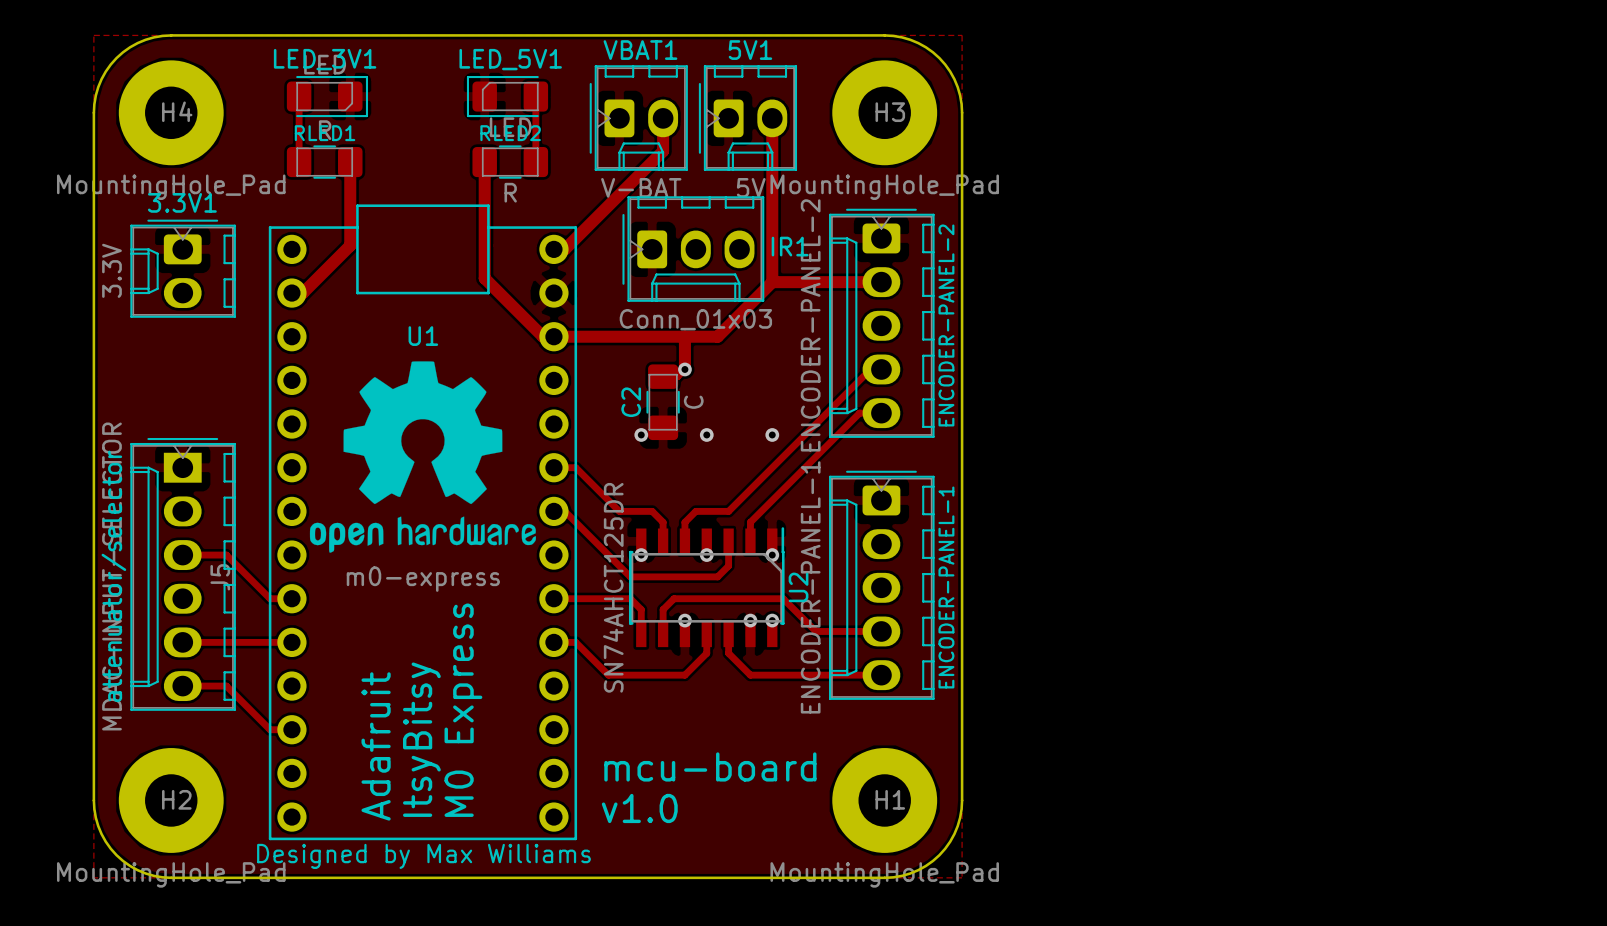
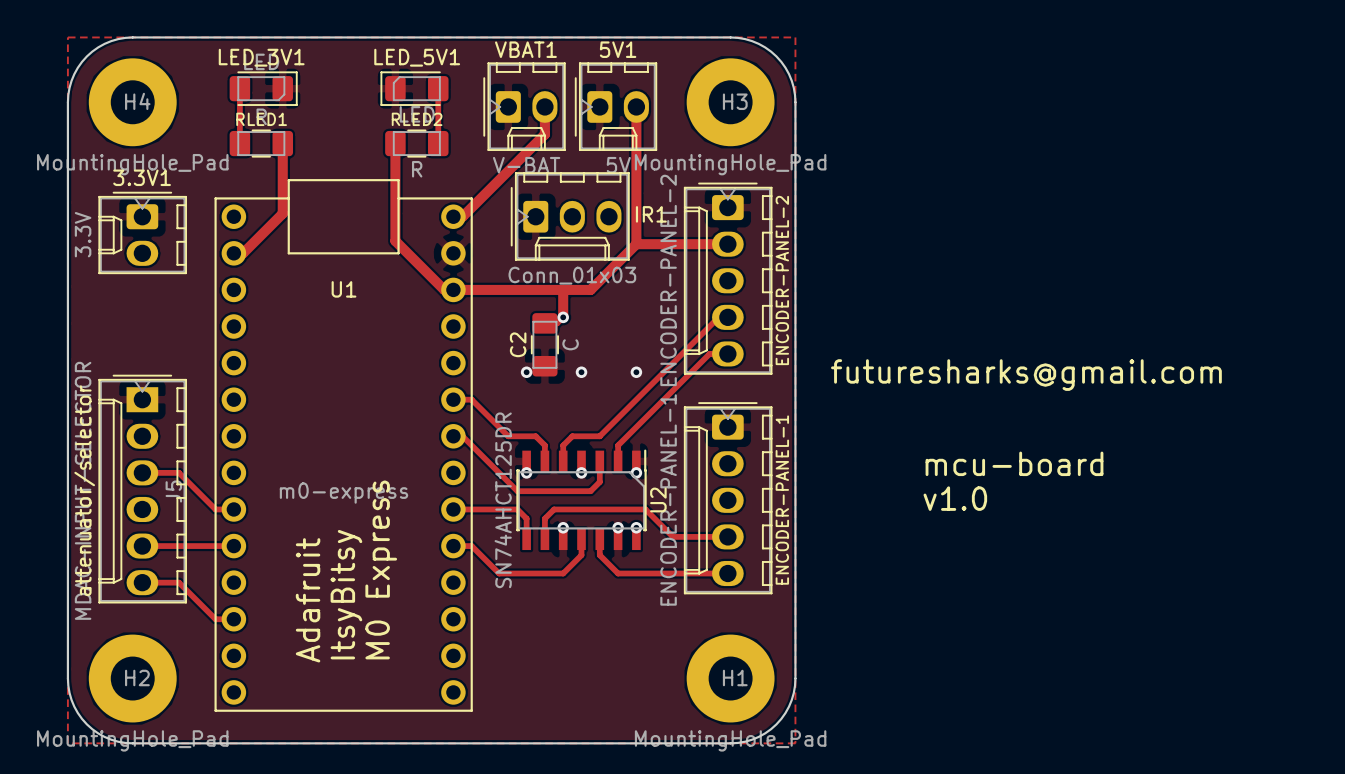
drawing: [309, 361, 536, 553] -> none
text: none -> futuresharks@gmail.com (1026, 375)
text: none -> mcu-board (1014, 463)
text: none -> v1.0 (955, 498)
text position: M0 Express (463, 710) -> M0 Express (381, 569)
text position: ItsyBitsy (421, 739) -> ItsyBitsy (346, 594)
text position: Adafruit (376, 746) -> Adafruit (308, 600)
text: mcu-board (710, 766) -> none
text: v1.0 (639, 808) -> none
text: Designed by Max Williams (423, 856) -> none

